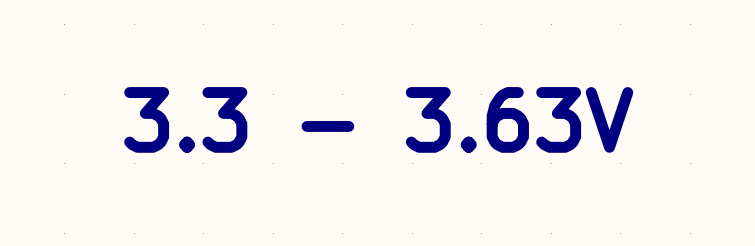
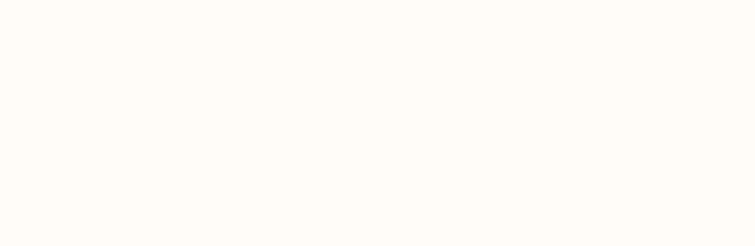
text: 3.3 - 3.63V (378, 119) -> none

